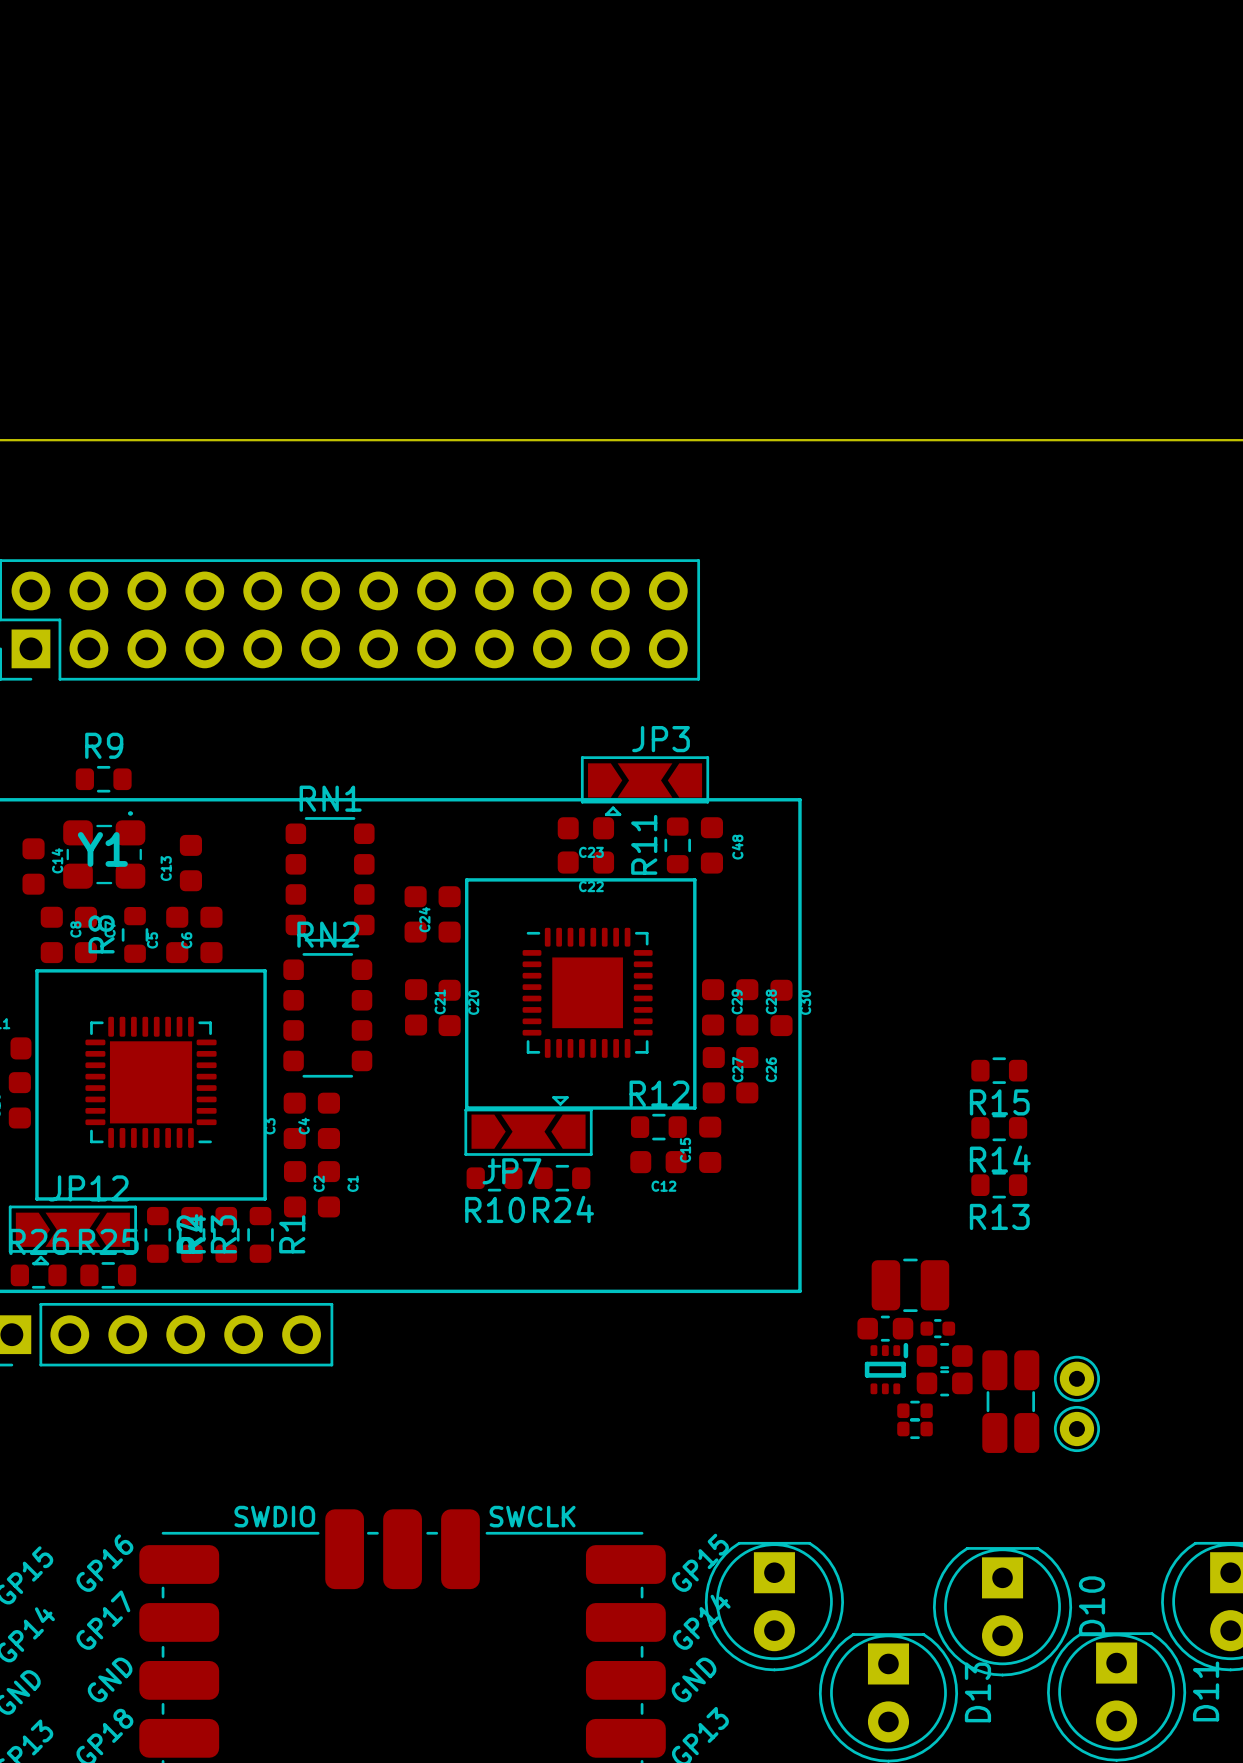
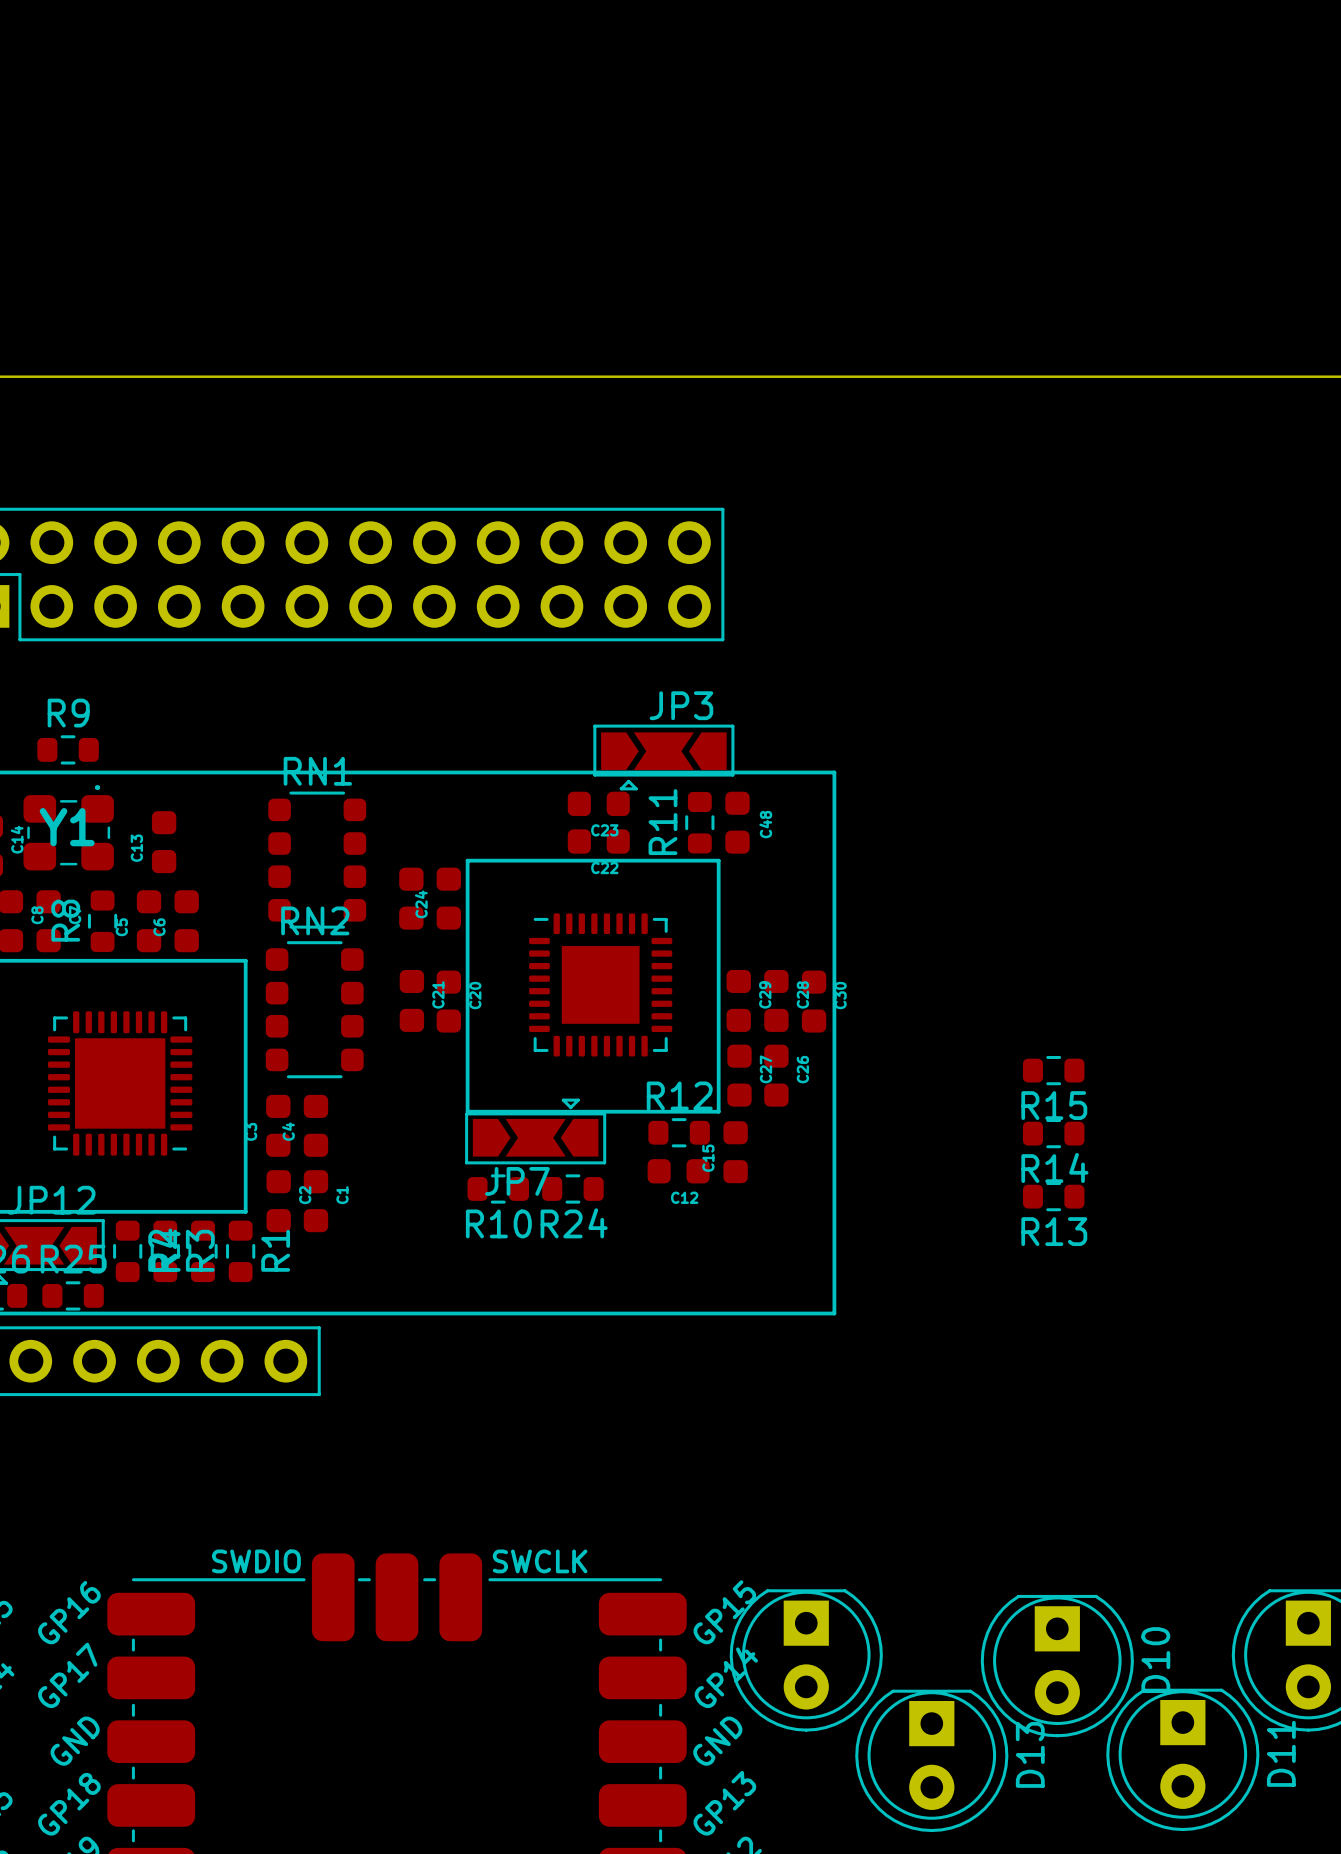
part: (910, 1285) -> none
part: (885, 1328) -> none
part: (937, 1328) -> none
part: (944, 1356) -> none
part: (886, 1368) -> none
part: (1076, 1378) -> none
part: (944, 1383) -> none
part: (1010, 1401) -> none
part: (915, 1410) -> none
part: (915, 1429) -> none
part: (1076, 1429) -> none

